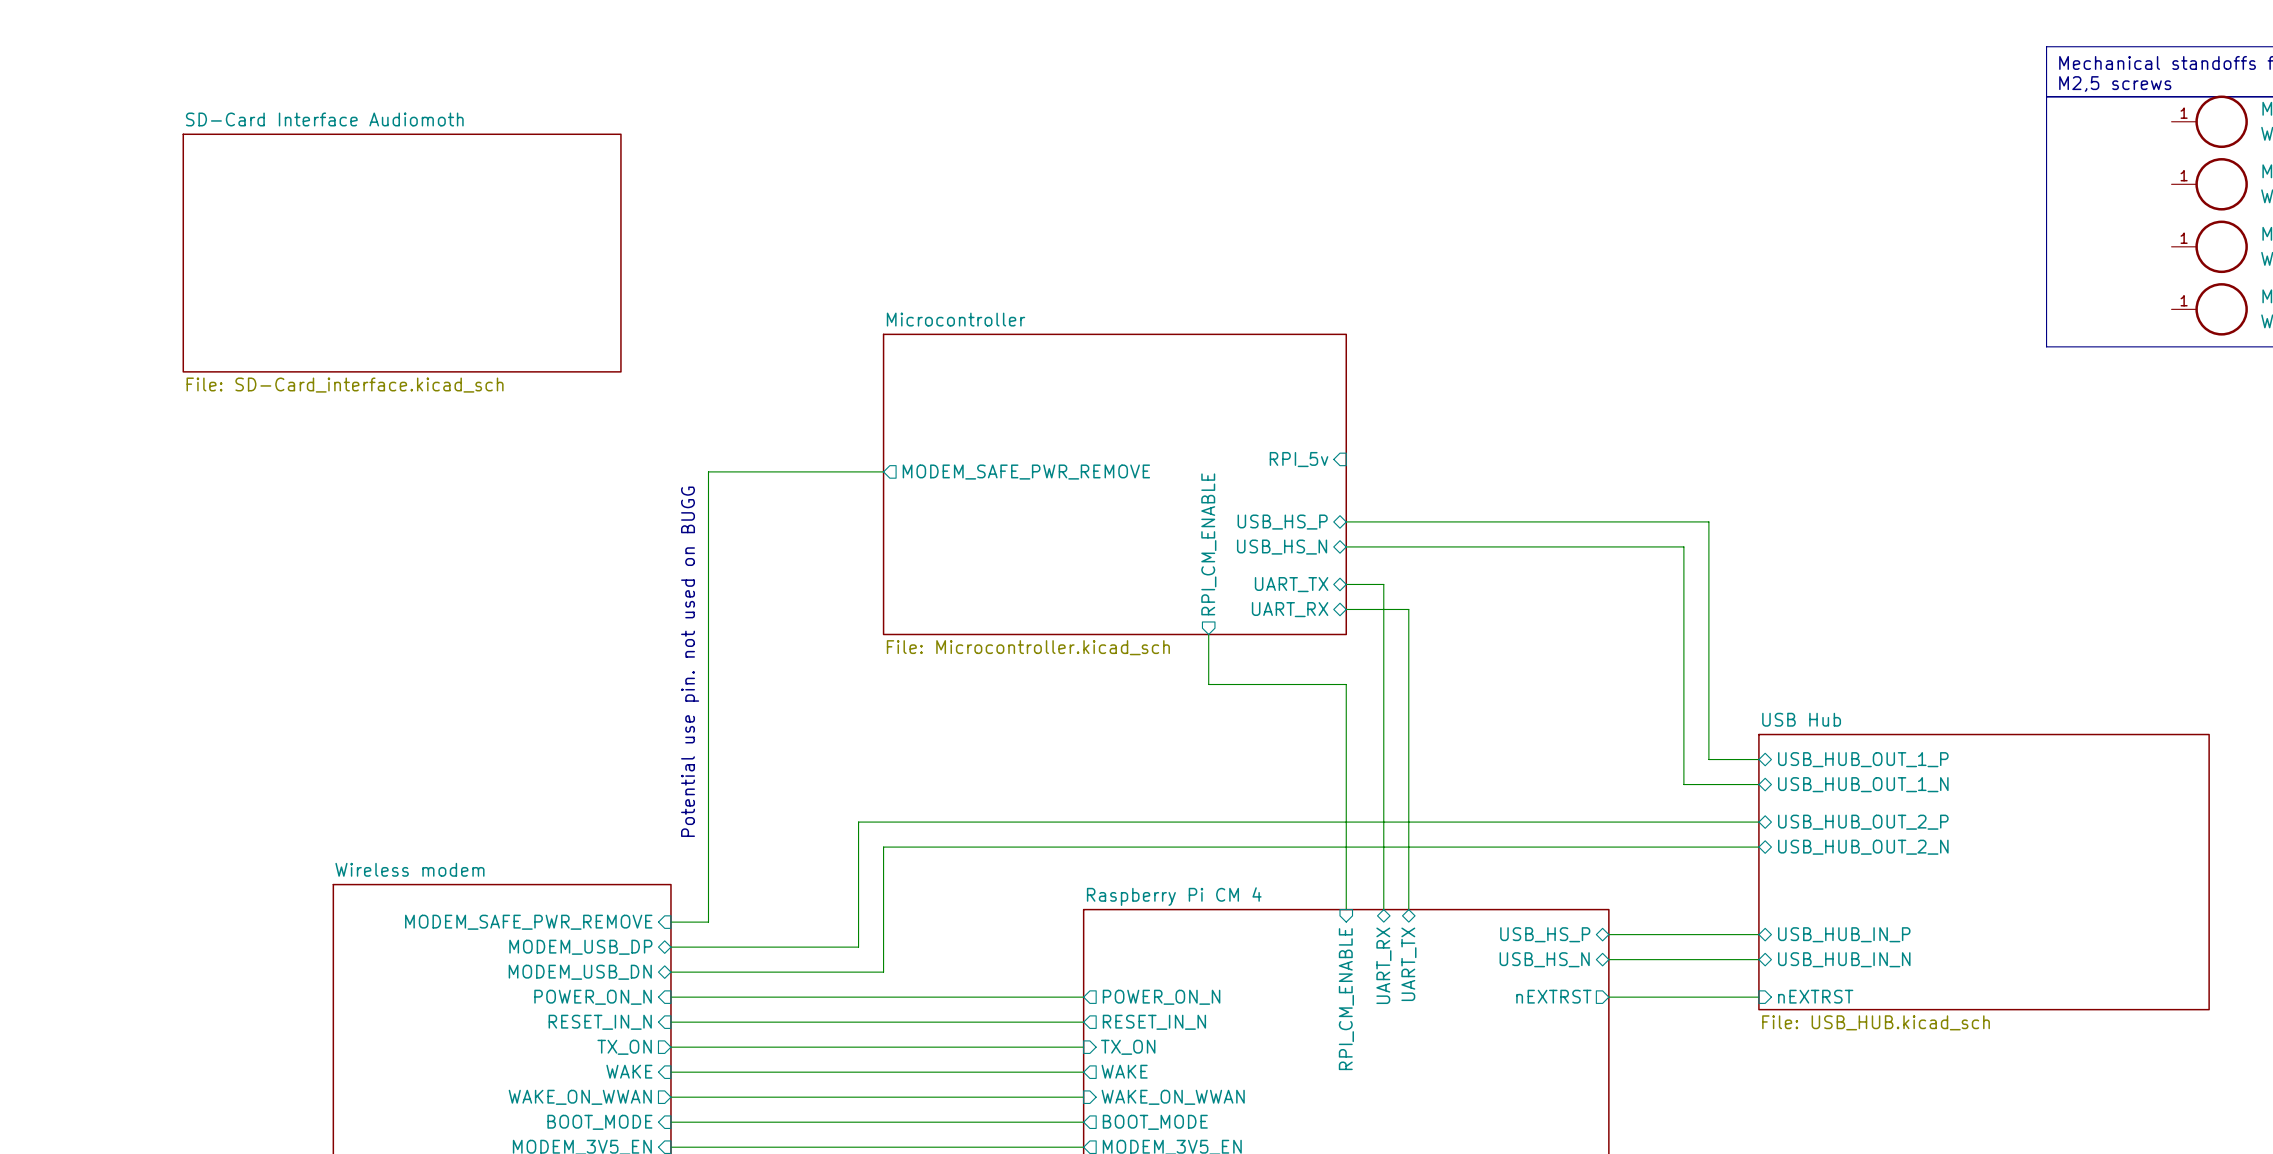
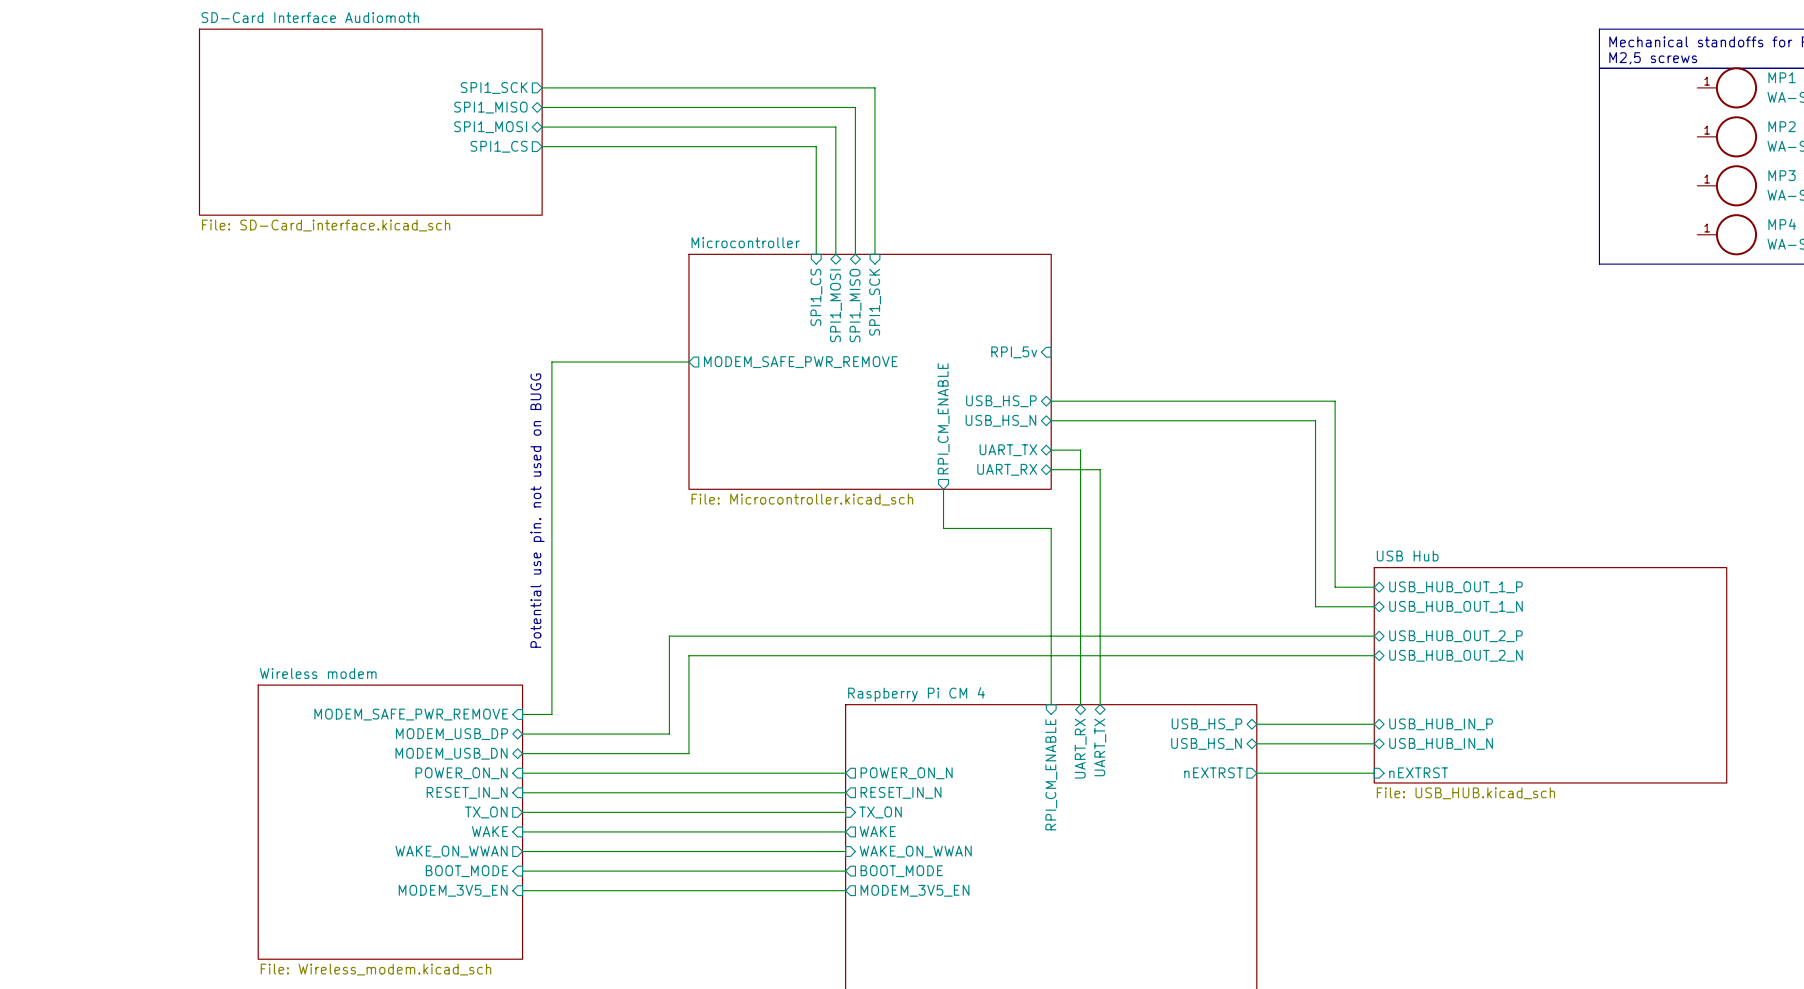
sheet pin: none -> SPI1_SCK (494, 88)
wire: none -> (542, 87) (874, 87) (874, 254)
sheet pin: none -> SPI1_MISO (490, 107)
wire: none -> (542, 107) (855, 107) (855, 254)
sheet pin: none -> SPI1_MOSI (490, 127)
wire: none -> (542, 127) (835, 127) (835, 254)
sheet pin: none -> SPI1_CS (499, 146)
wire: none -> (542, 146) (816, 146) (816, 254)
sheet SD-Card Interface Audiomoth position: (402, 253) -> (370, 122)
sheet pin: none -> SPI1_CS (816, 297)
sheet pin: none -> SPI1_SCK (875, 302)
sheet pin: none -> SPI1_MISO (855, 305)
sheet pin: none -> SPI1_MOSI (835, 305)

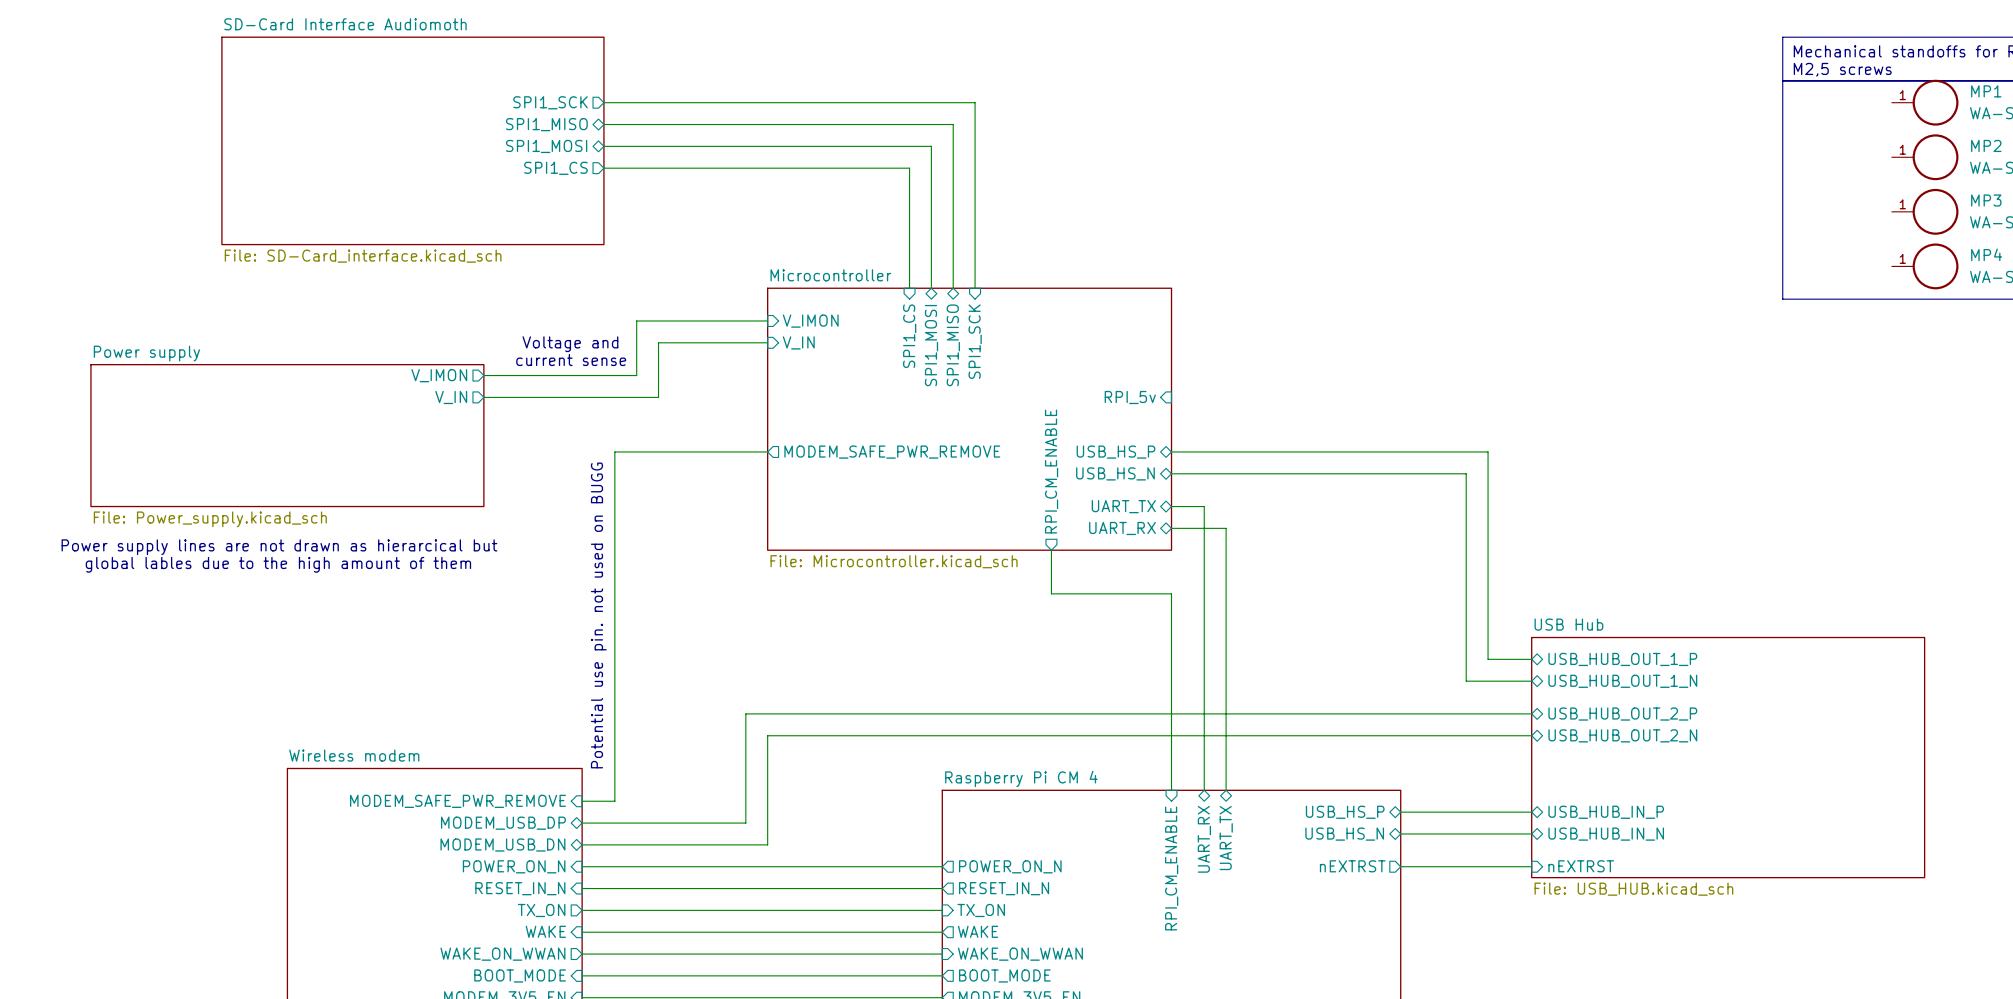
wire: none -> (767, 320) (636, 320) (636, 375) (483, 375)
sheet pin: none -> V_IMON (810, 321)
wire: none -> (767, 342) (658, 342) (658, 397) (483, 397)
sheet pin: none -> V_IN (798, 342)
text: none -> Voltage and (570, 344)
text: none -> current sense (571, 359)
sheet pin: none -> V_IMON (439, 375)
sheet pin: none -> V_IN (451, 397)
wire: (688, 362) (551, 362) (551, 401) -> (767, 451) (614, 451)
sheet pin position: MODEM_SAFE_PWR_REMOVE (800, 362) -> MODEM_SAFE_PWR_REMOVE (892, 452)
sheet Power supply: none -> File: Power_supply.kicad_sch (287, 435)
text: none -> Power supply lines are not drawn as hierarcical but (279, 547)
text: none -> global lables due to the high amount of them (278, 564)
text position: Potential use pin. not used on BUGG (537, 510) -> Potential use pin. not used on BUGG (598, 615)

